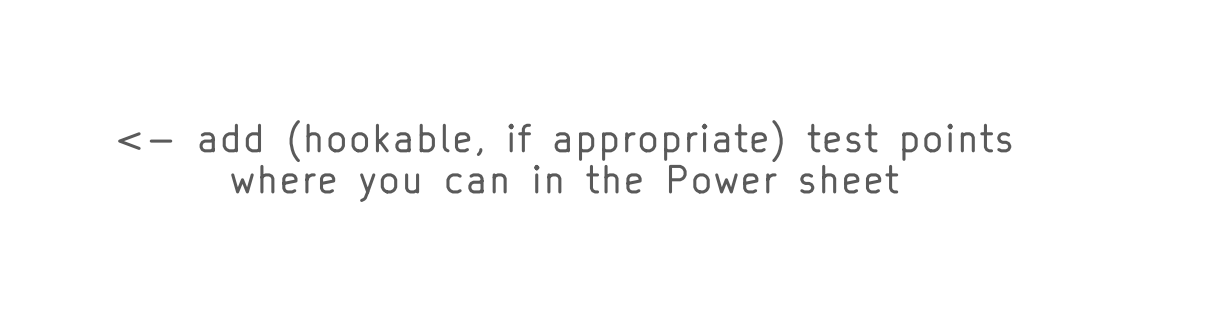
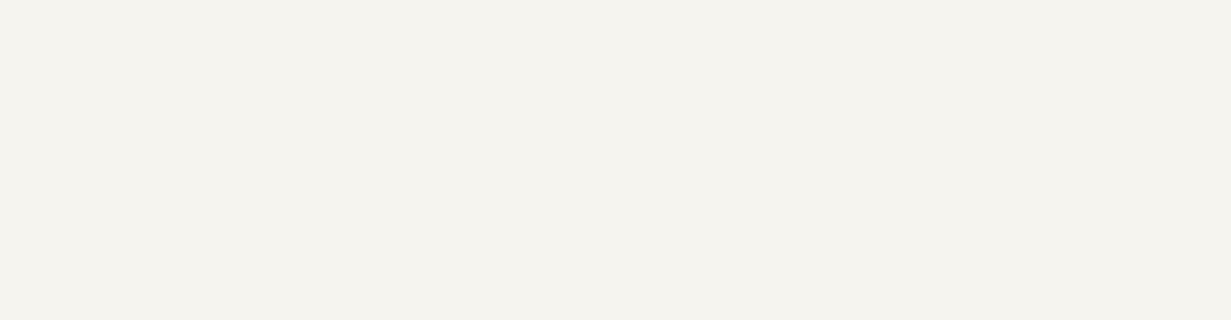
text: <- add (hookable, if appropriate) test points (564, 141) -> none
text: where you can in the Power sheet (564, 183) -> none

